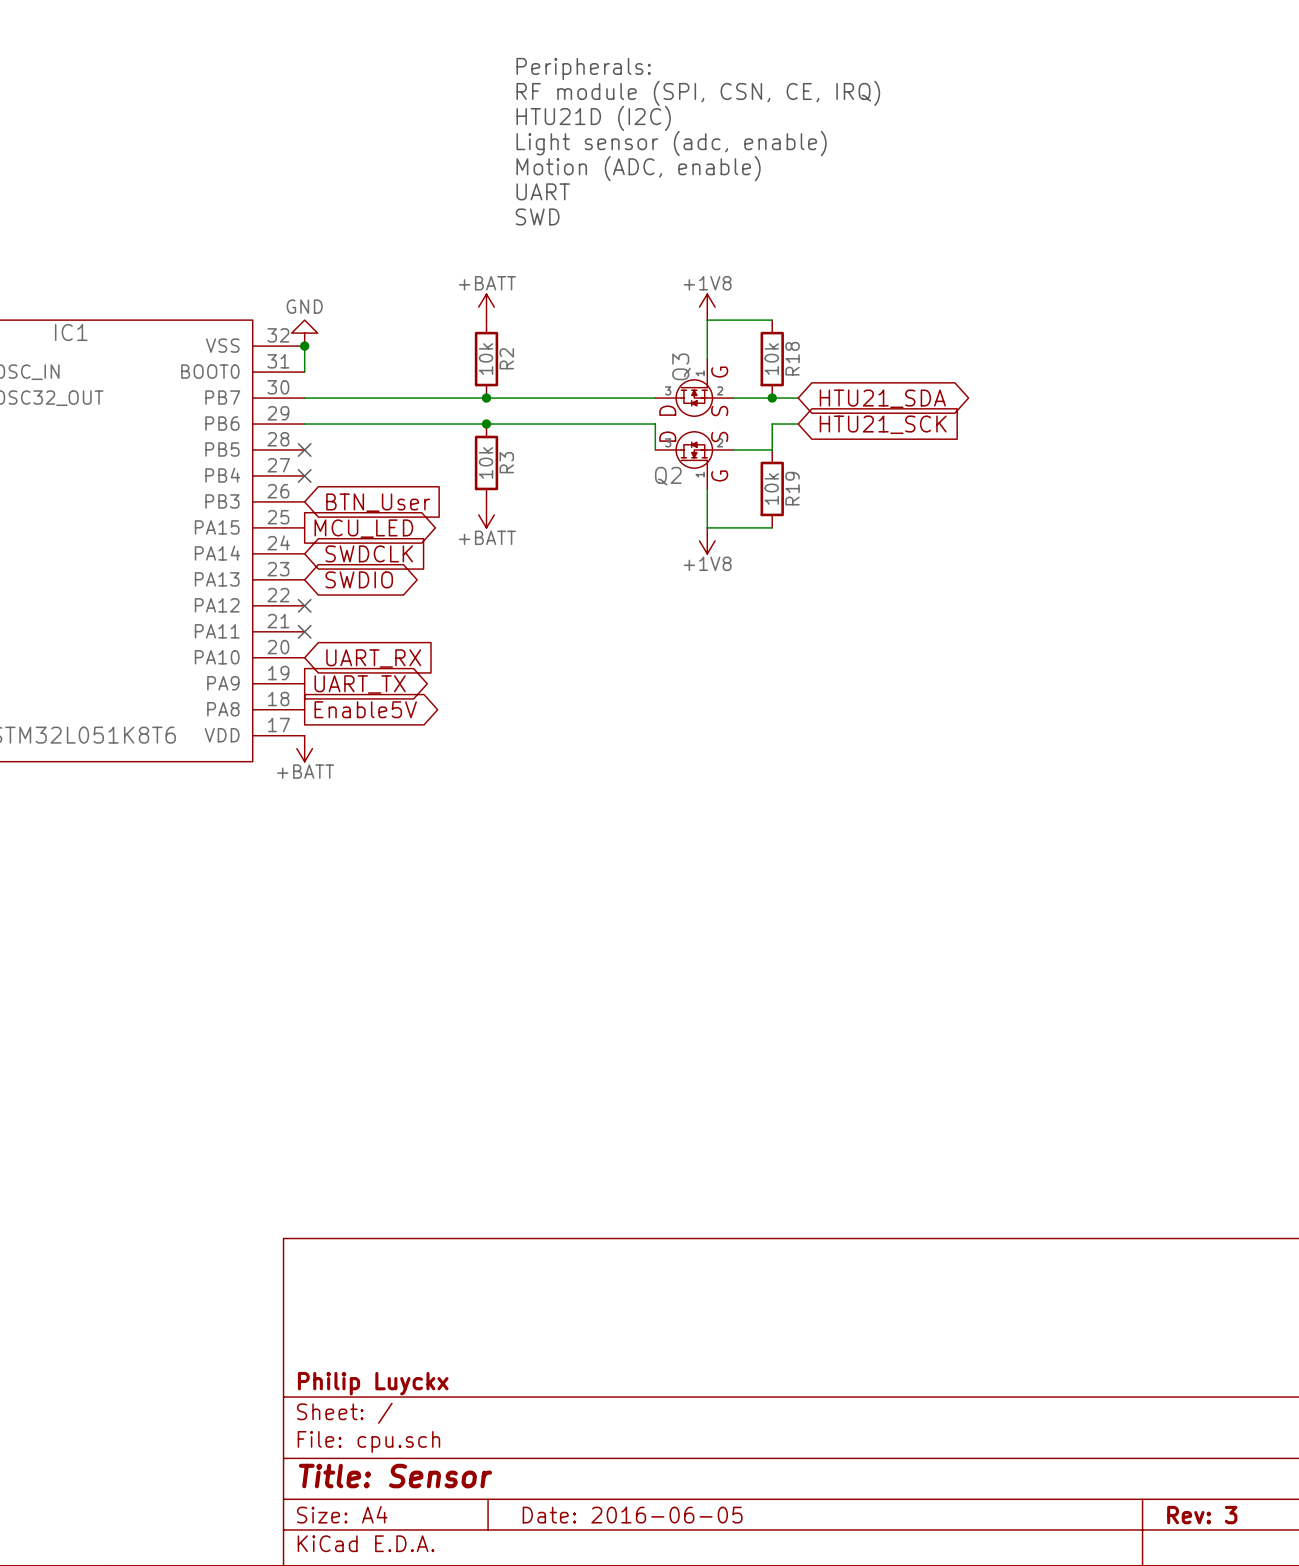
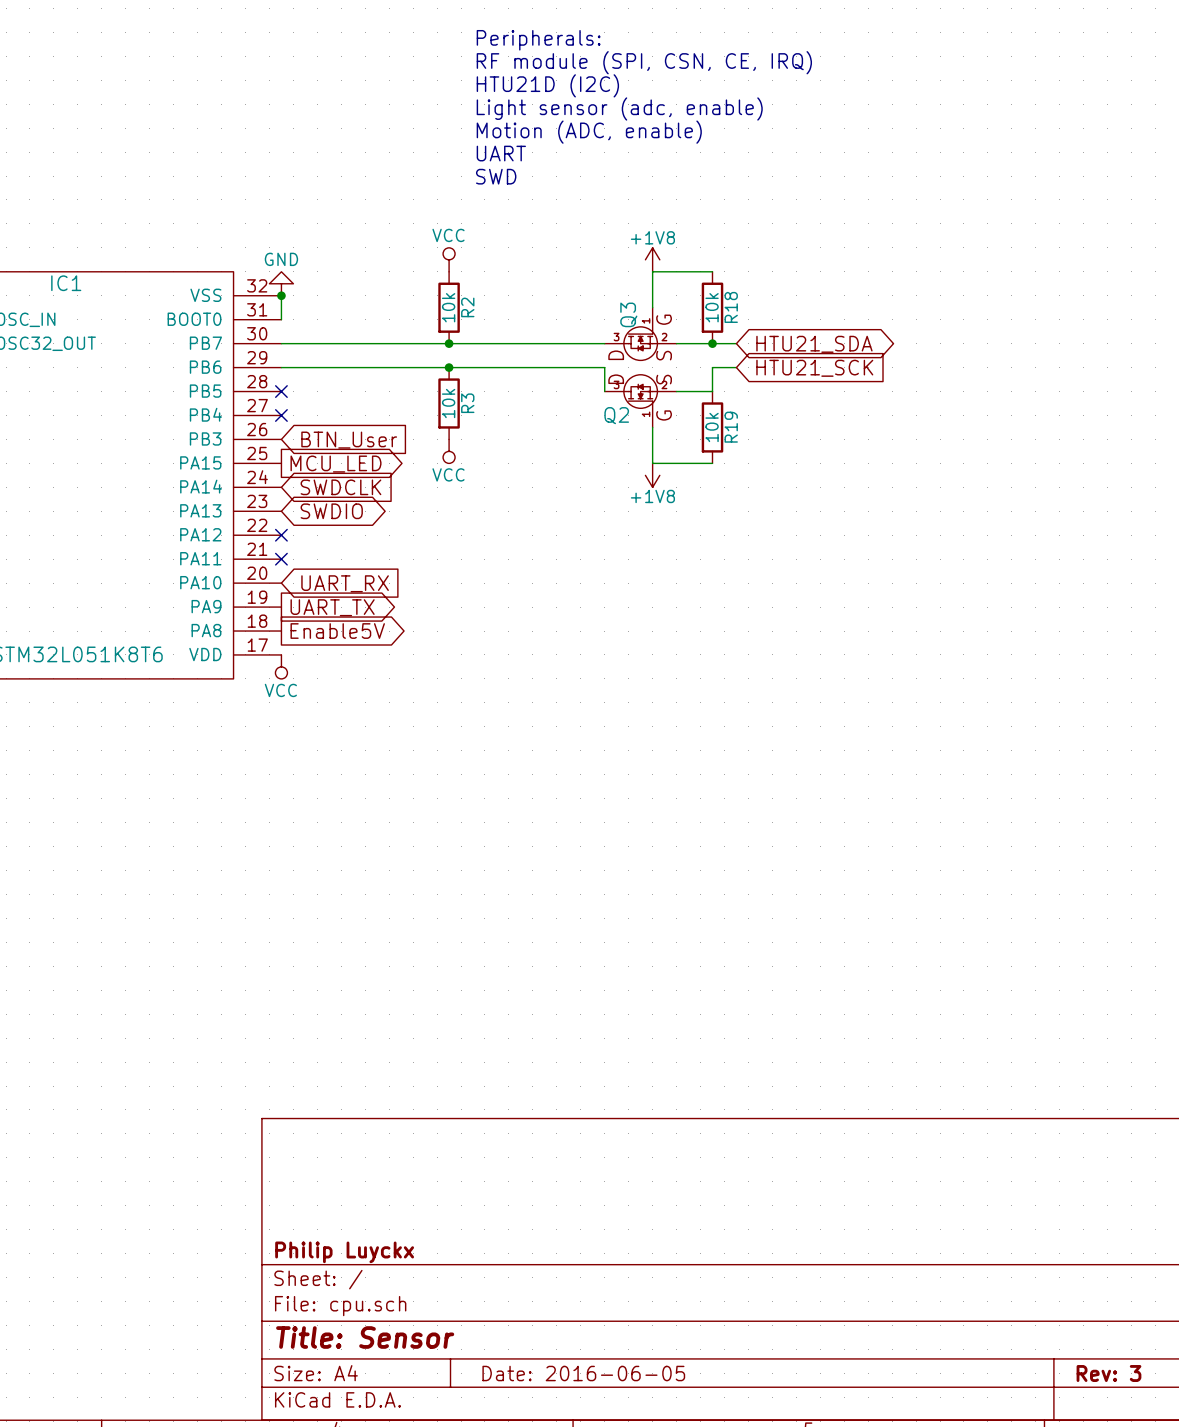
power symbol: +BATT (486, 307) -> VCC (449, 259)
power symbol: +BATT (486, 514) -> VCC (449, 451)
power symbol: +BATT (304, 748) -> VCC (281, 666)

